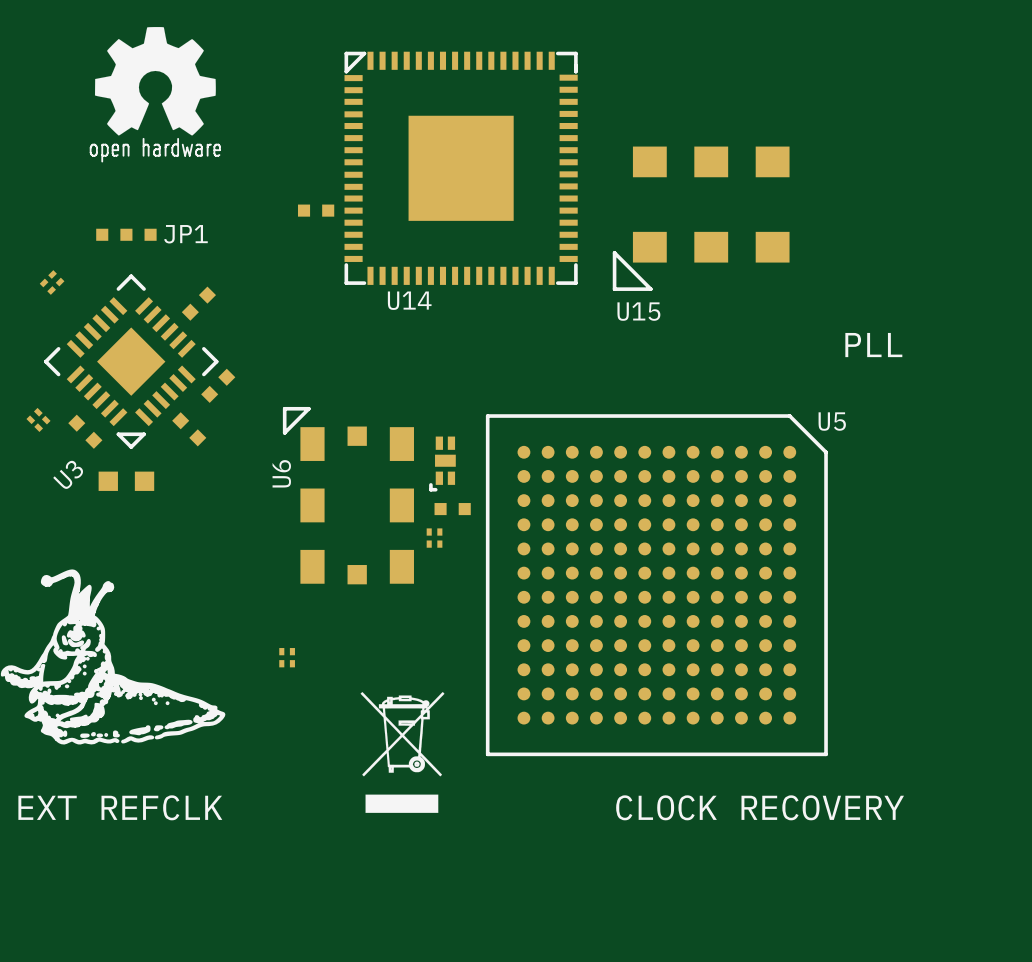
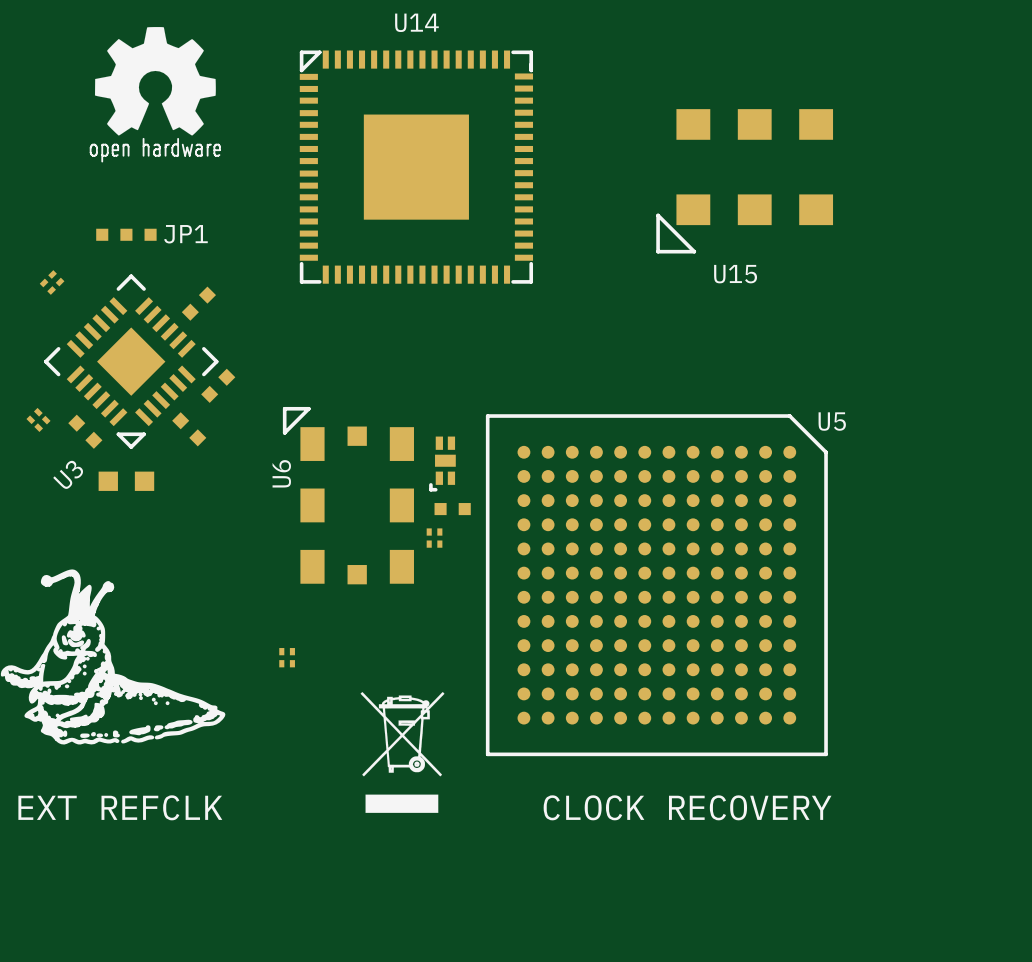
U14 position: (461, 168) -> (416, 167)
part: (316, 210) -> none
U15 position: (701, 218) -> (744, 181)
U14 name position: U14 (409, 300) -> U14 (416, 22)
U15 name position: U15 (638, 311) -> U15 (735, 274)
text: PLL (873, 345) -> none
text position: CLOCK RECOVERY (760, 807) -> CLOCK RECOVERY (687, 807)

